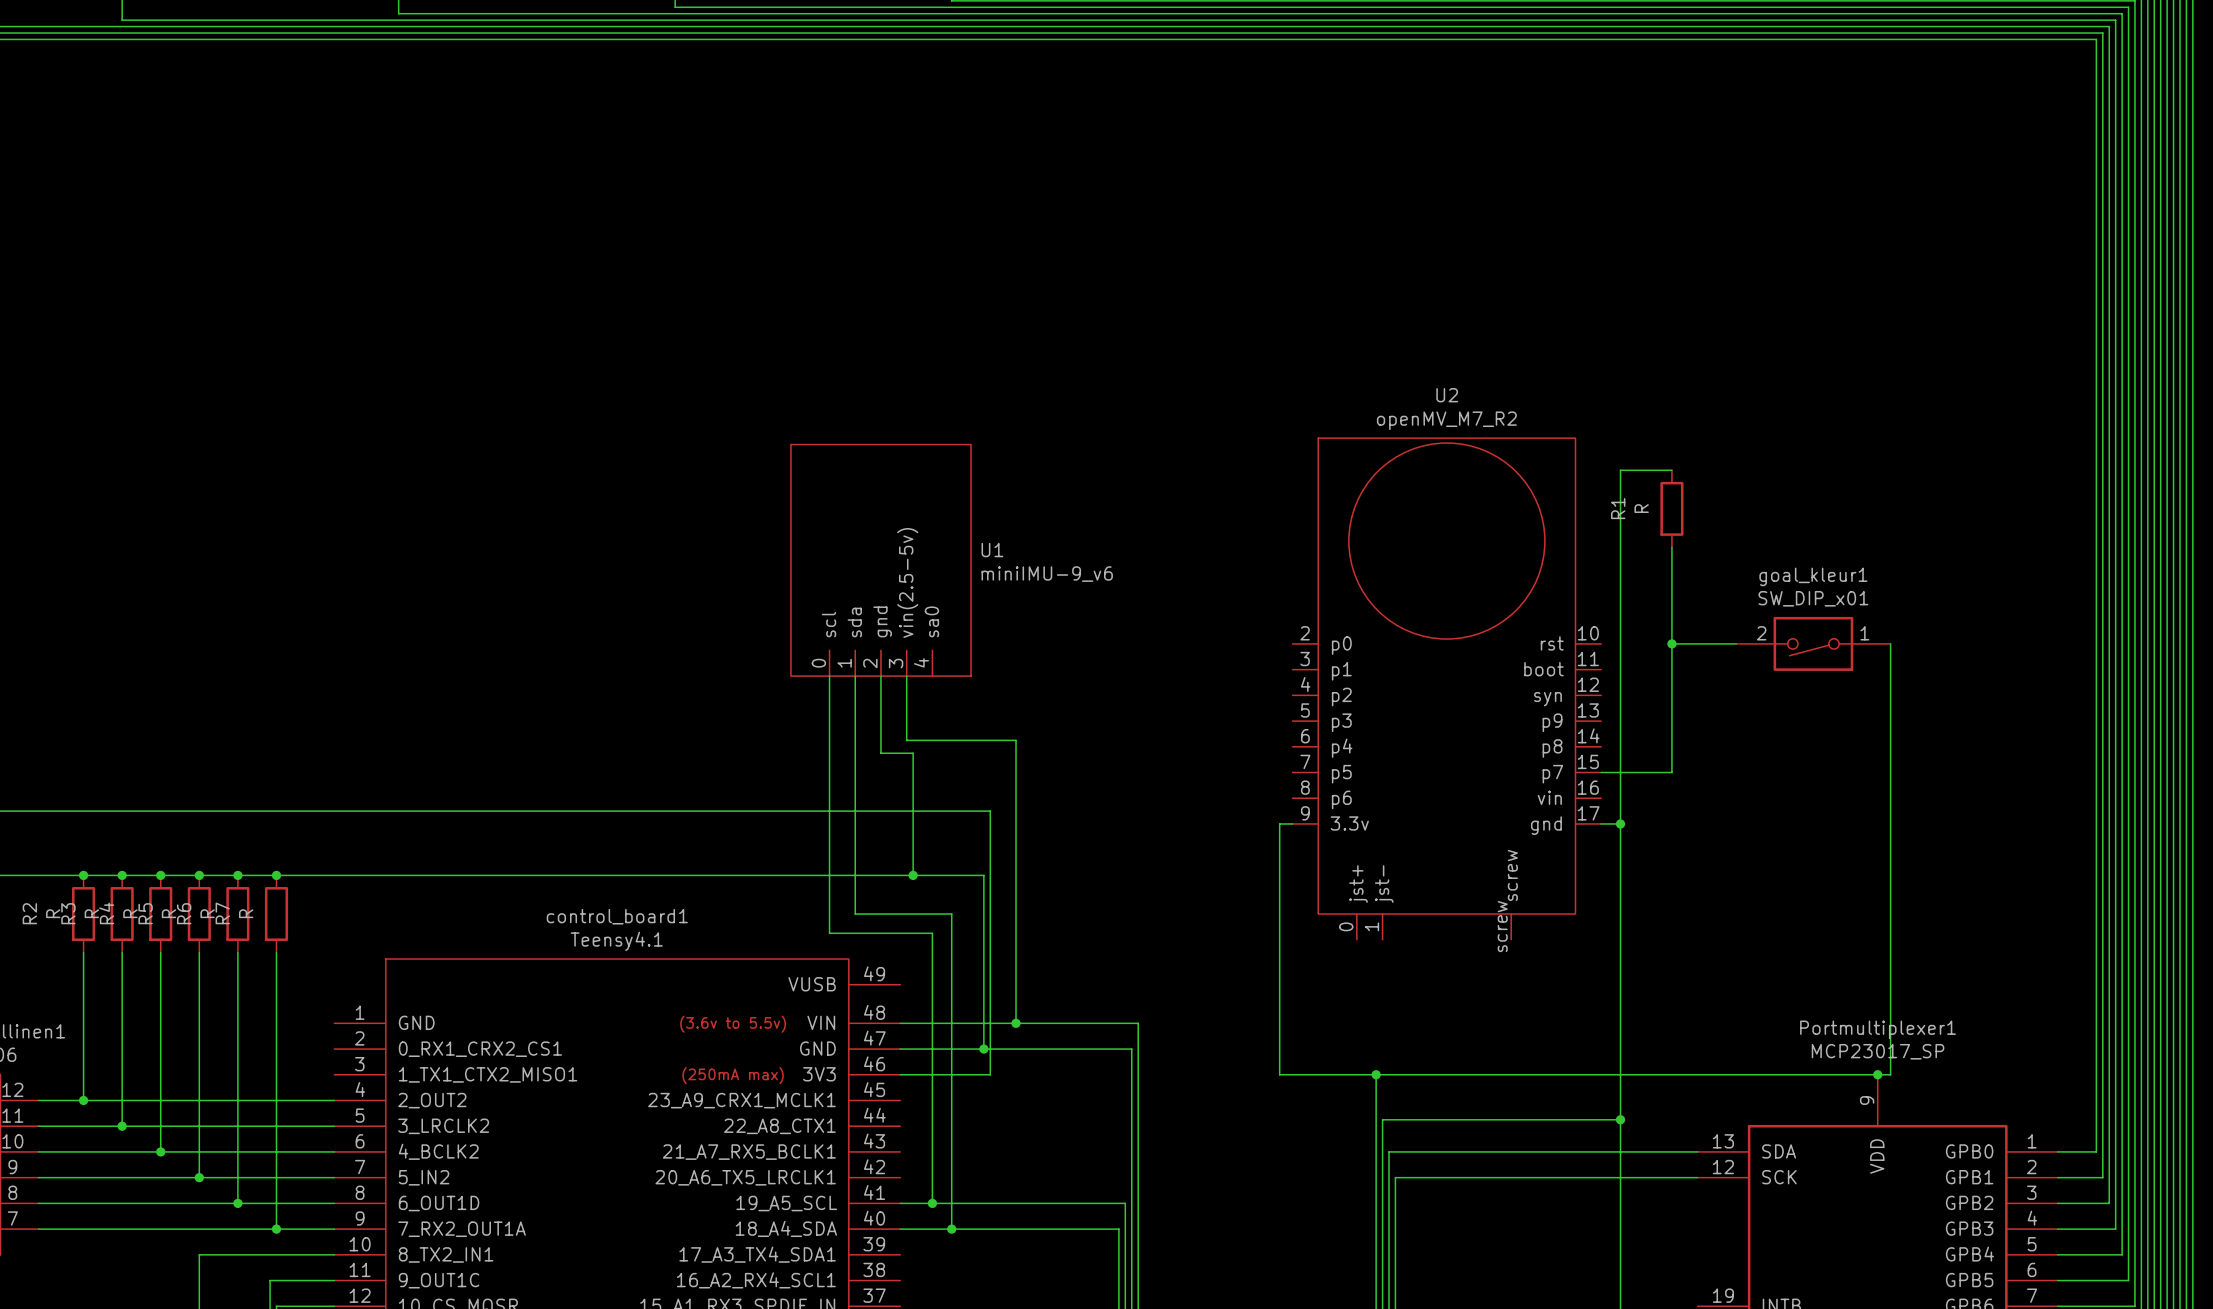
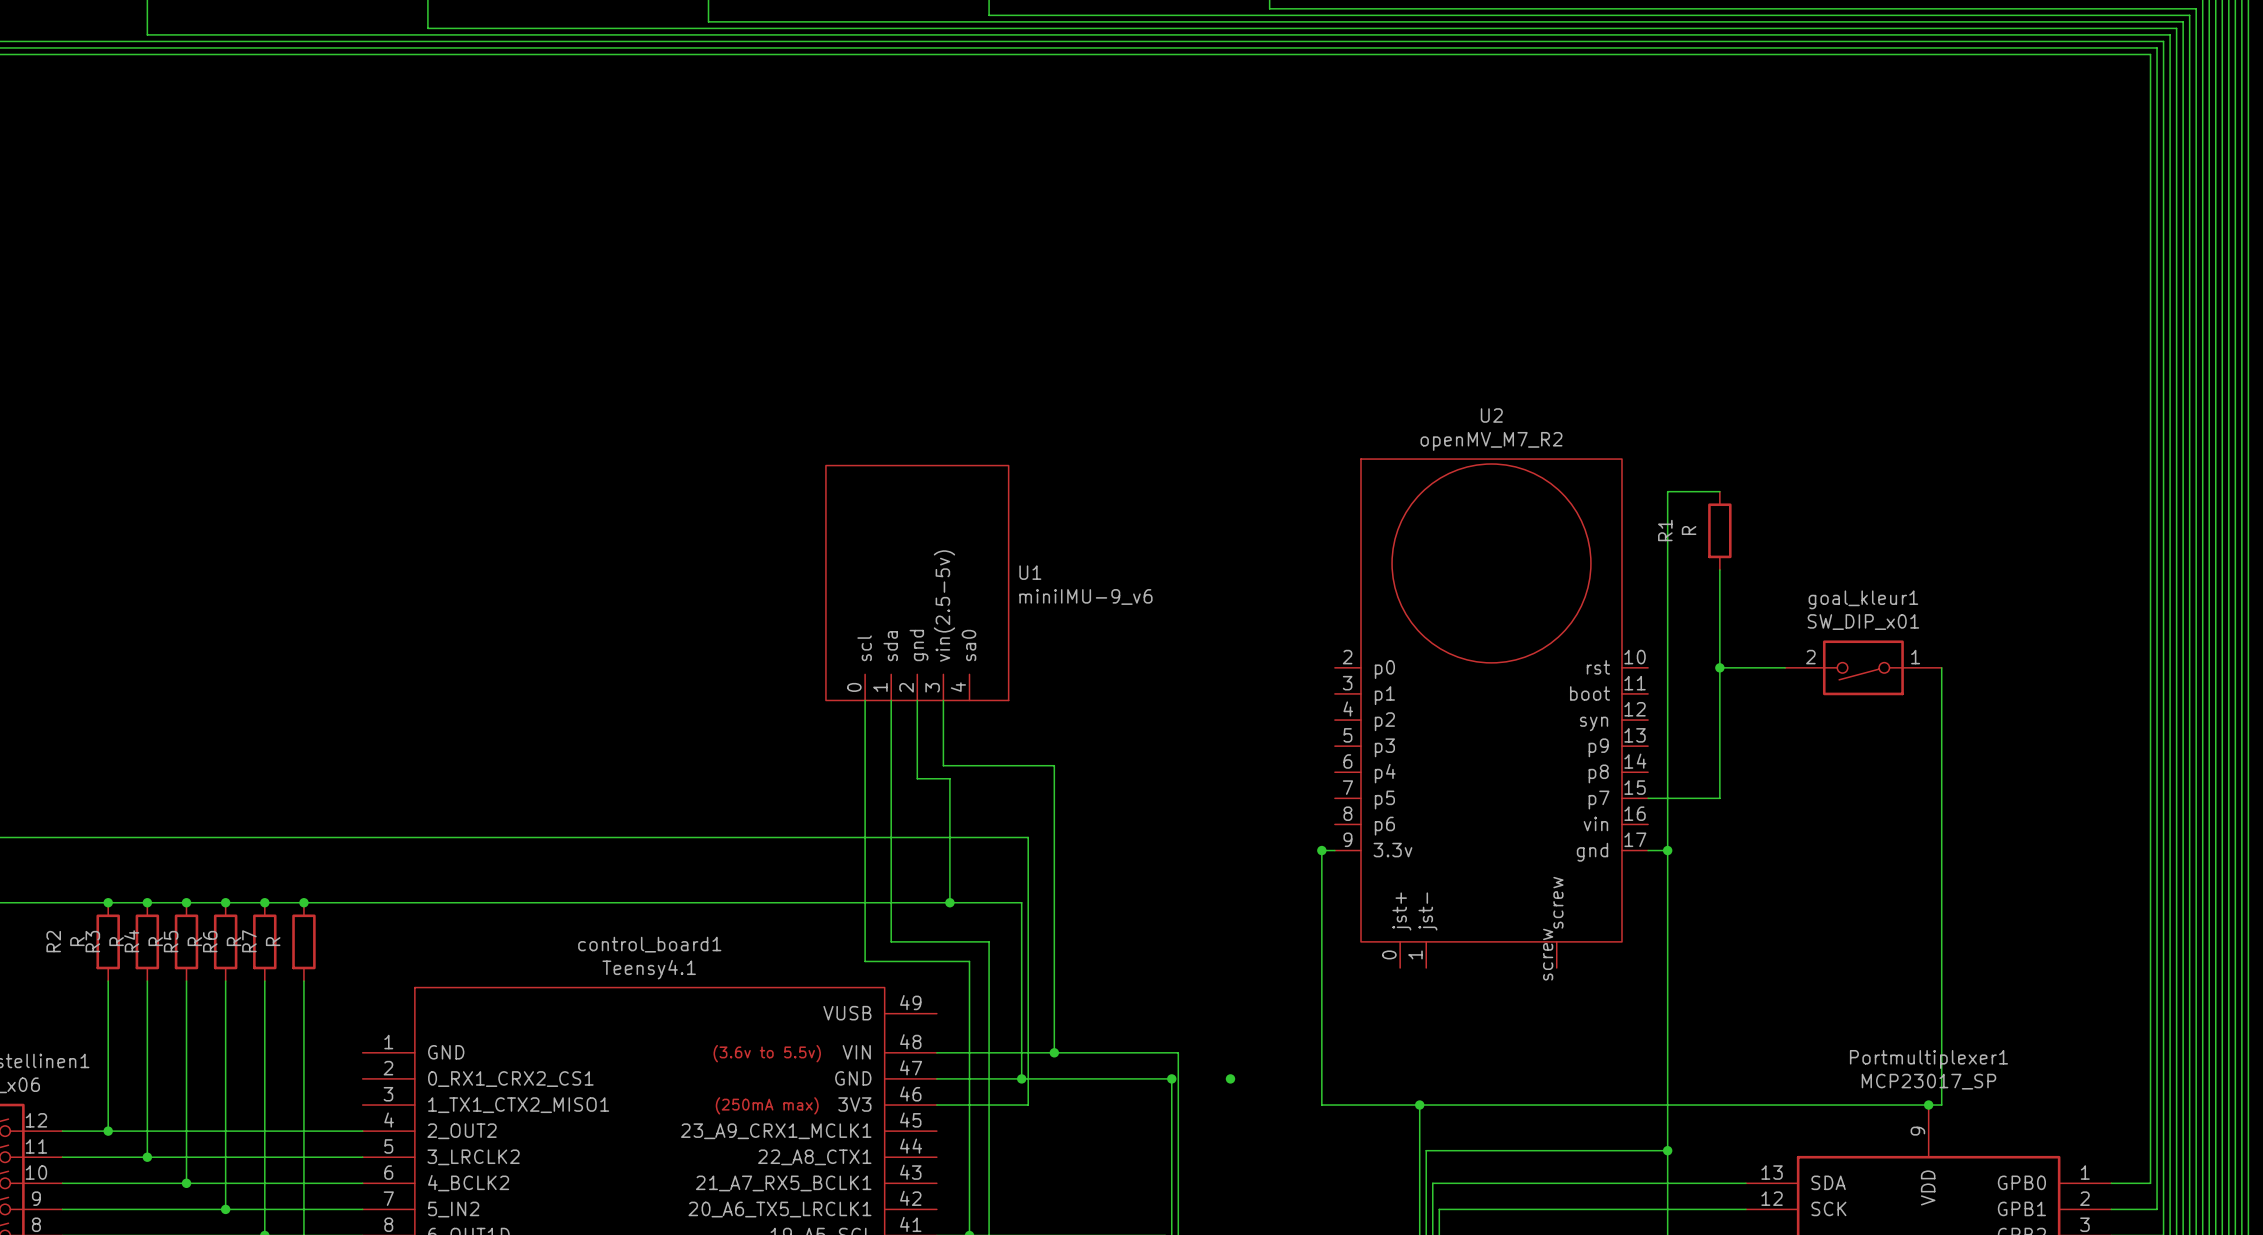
junction: none -> (1321, 850)
junction: none -> (1171, 1078)
junction: none -> (1230, 1078)

